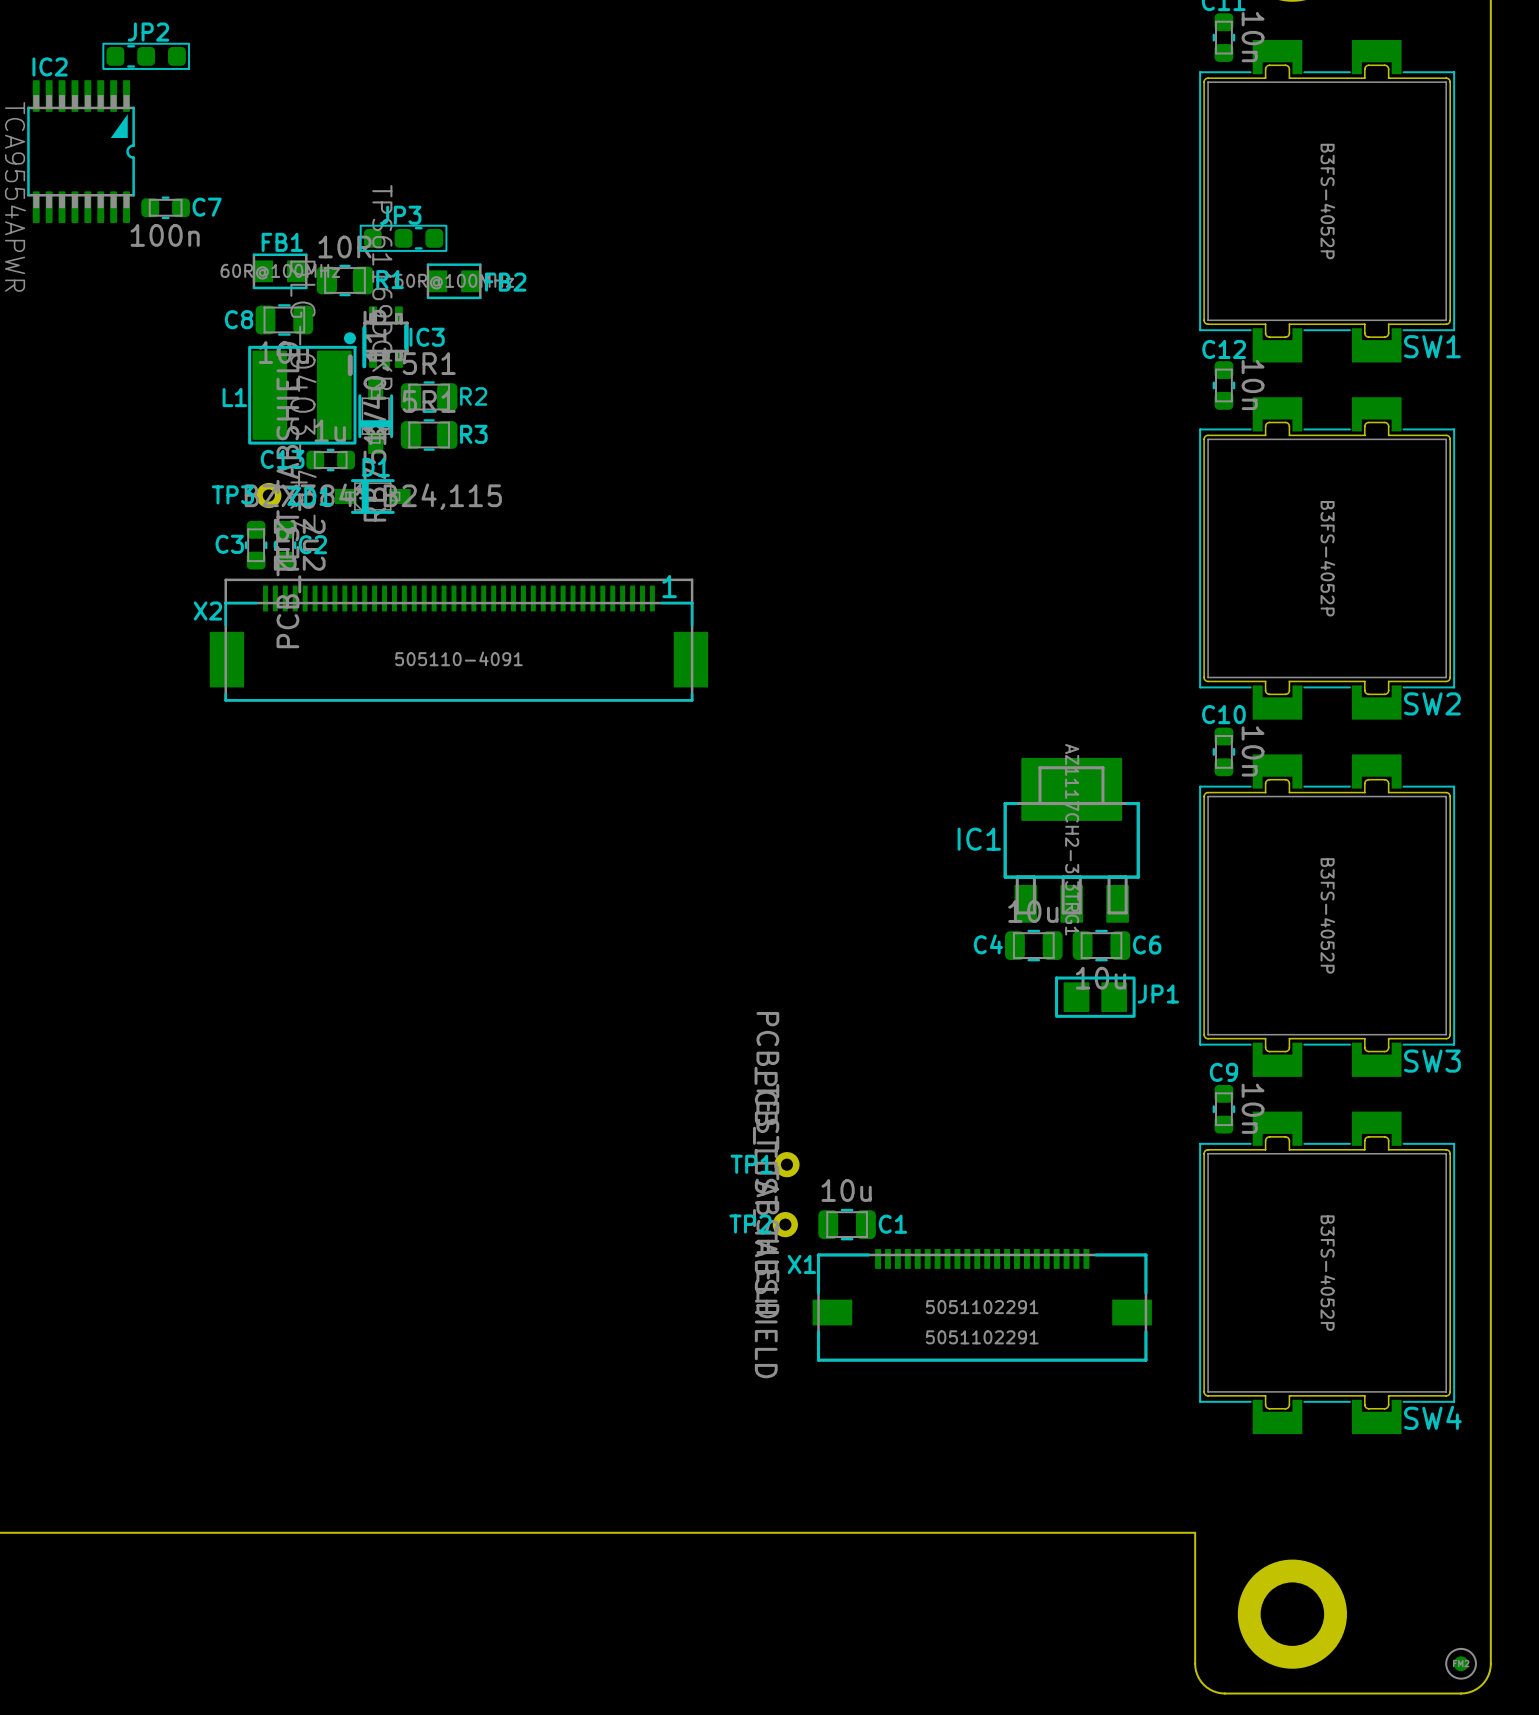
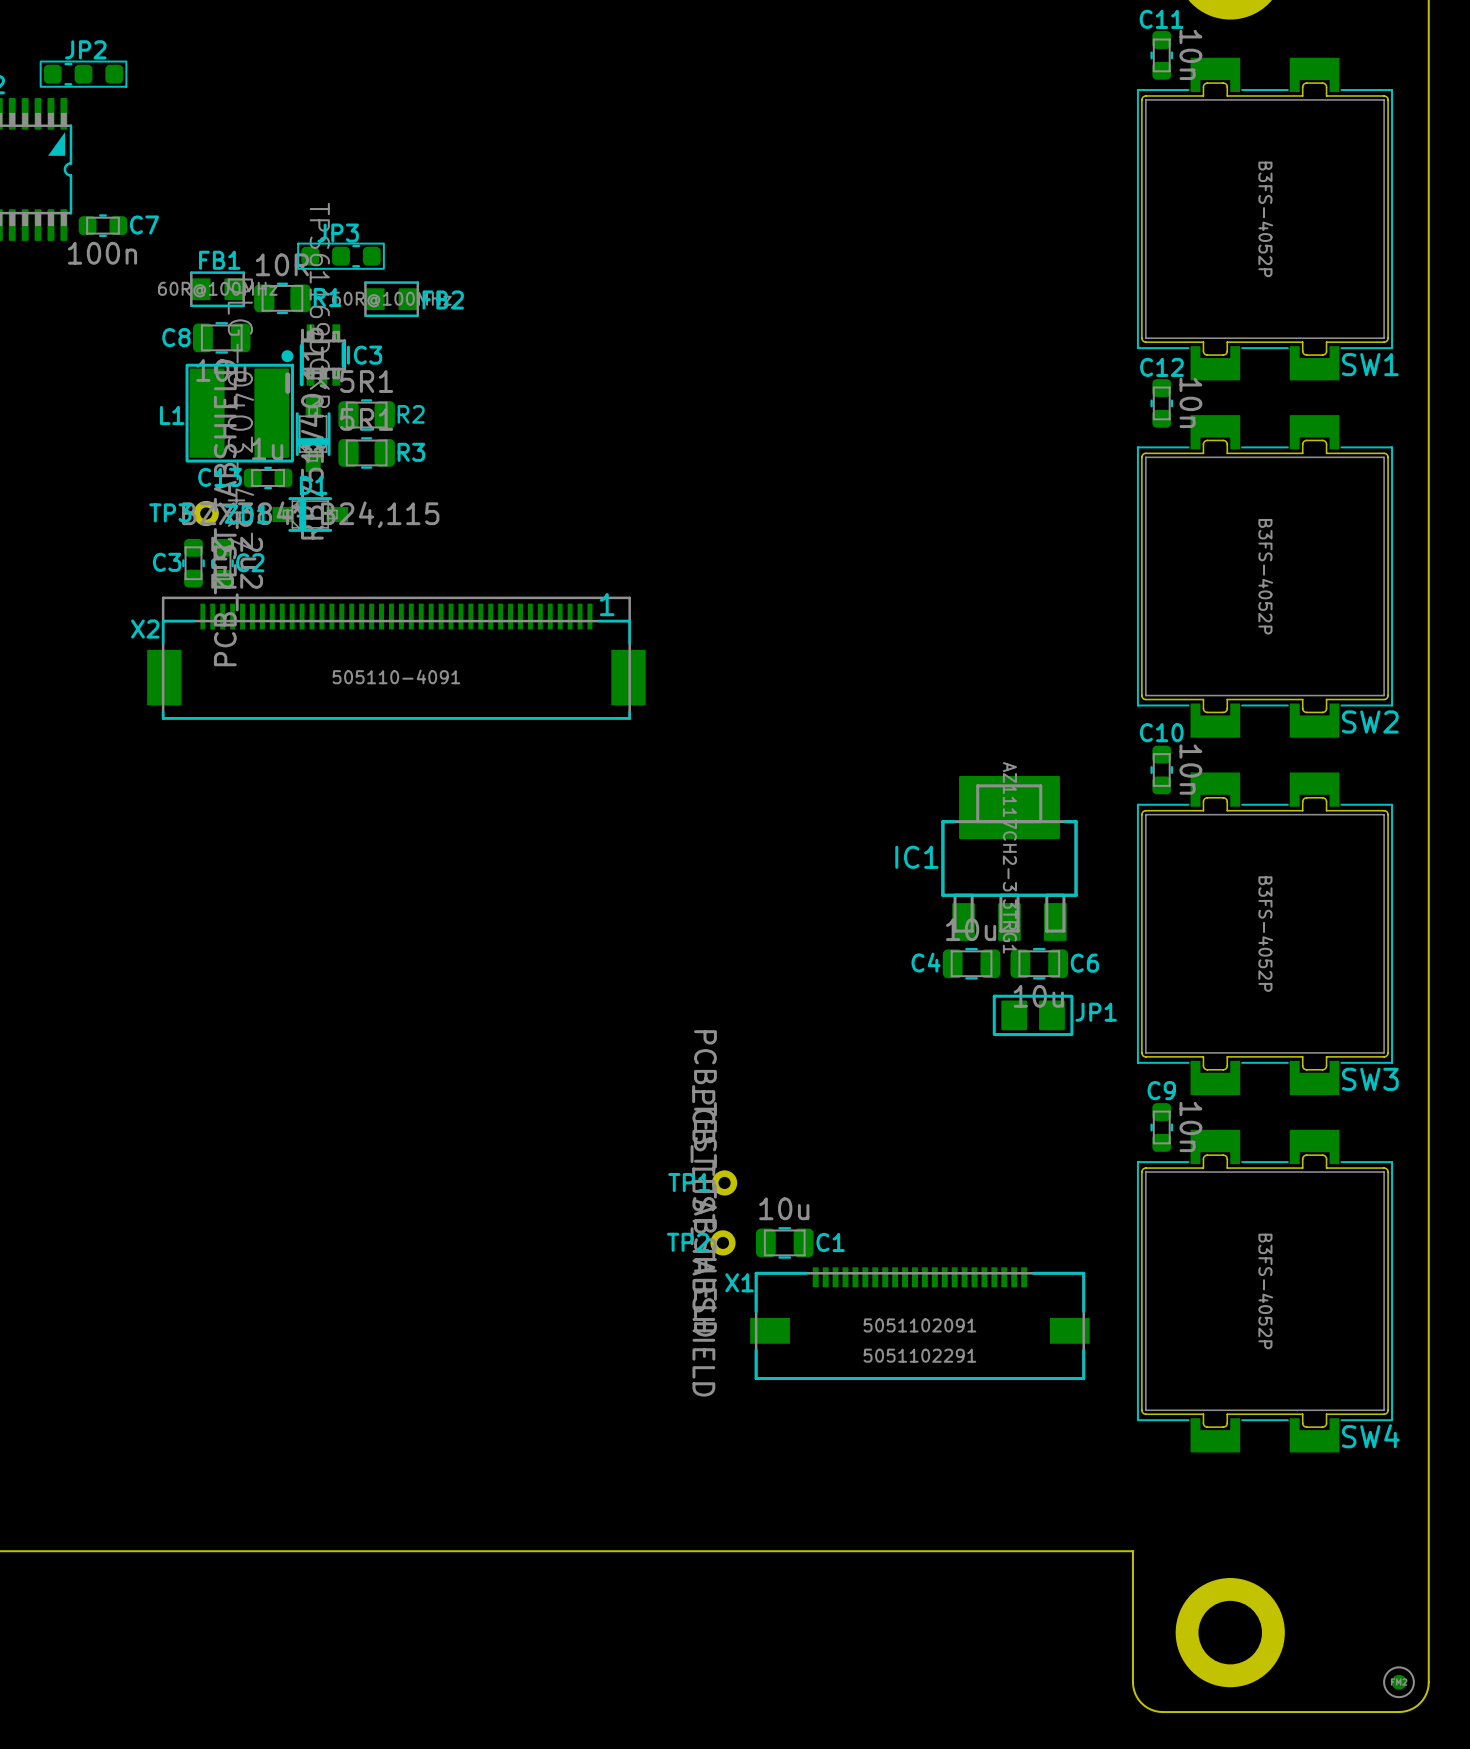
X1 value: 5051102291 (982, 1307) -> 5051102091 (919, 1325)

